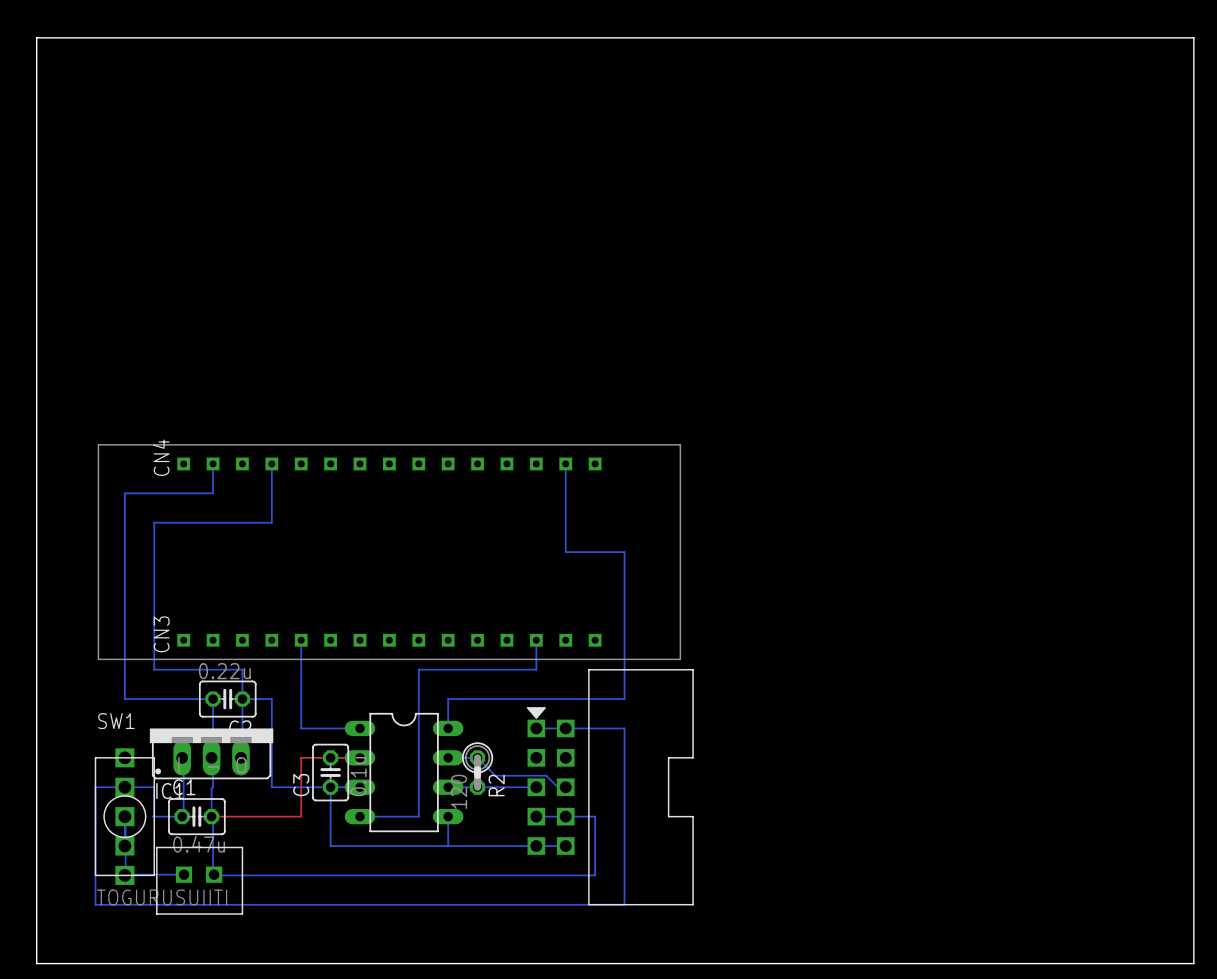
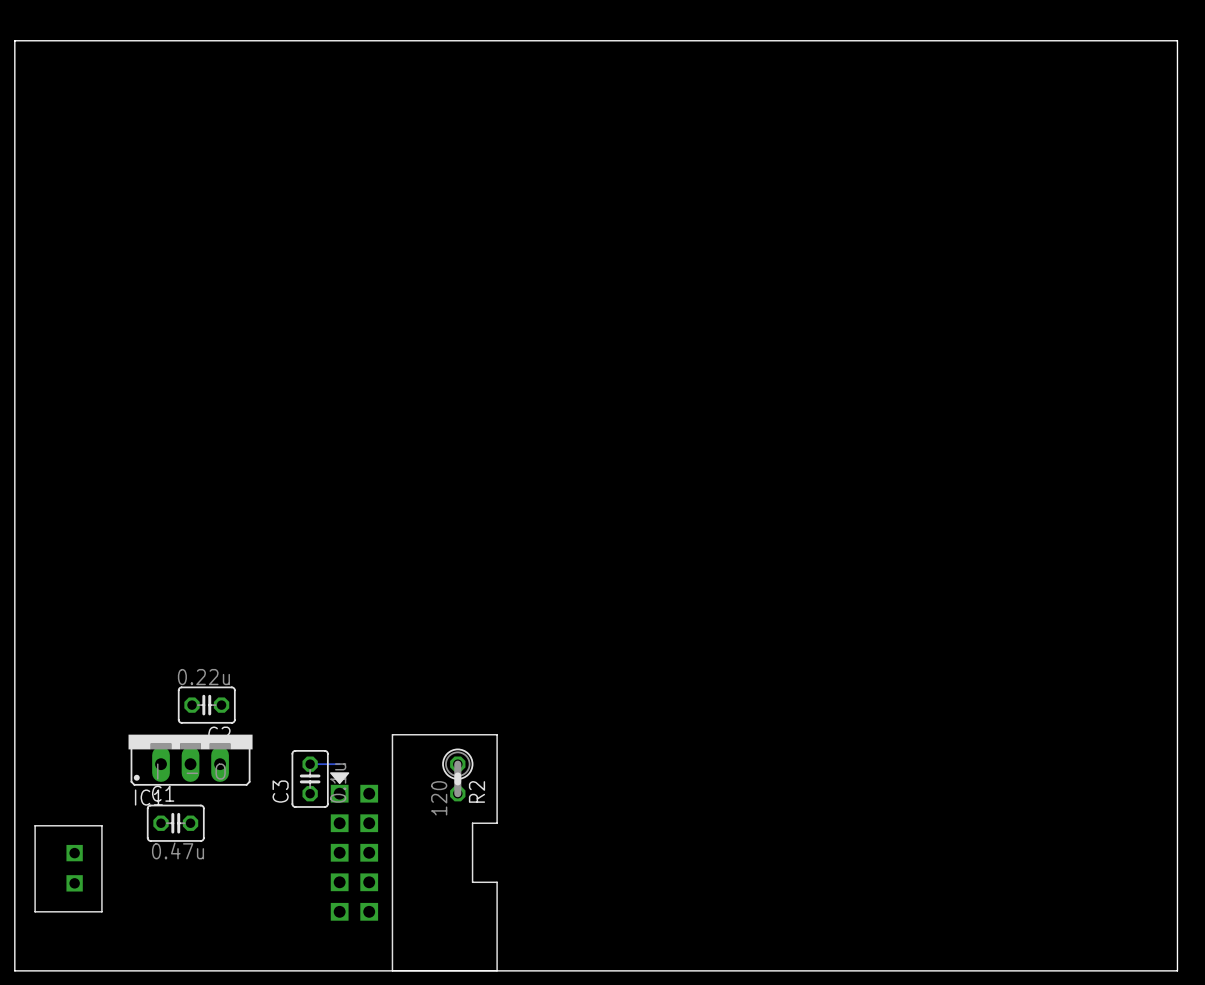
bottom track: (213, 463) (213, 493) (124, 493) (124, 699) (213, 699) (213, 875) (595, 875) (595, 816) (536, 816) -> none
bottom track: (271, 463) (271, 522) (154, 522) (154, 669) (242, 669) (240, 757) -> none
bottom track: (565, 463) (565, 552) (624, 552) (624, 699) (448, 699) (448, 728) -> none
part: (389, 552) -> none
bottom track: (301, 640) (301, 728) (360, 728) -> none
bottom track: (536, 640) (536, 669) (418, 669) (418, 816) (360, 816) -> none
bottom track: (242, 699) (271, 699) (271, 787) (360, 787) -> none
bottom track: (536, 728) (624, 728) (624, 904) (95, 904) (95, 787) (154, 787) (154, 816) -> none
bottom track: (182, 757) (183, 816) (152, 816) -> none
top track: (360, 757) (301, 757) (301, 816) (211, 816) -> none
bottom track: (448, 757) (477, 757) (495, 775) (546, 775) (557, 787) (565, 787) -> none
part: (404, 772) -> none
bottom track: (330, 787) (330, 846) (565, 846) -> none
bottom track: (448, 787) (536, 787) -> none
part position: (610, 787) -> (413, 852)
SW1: TOGURUSUIITI (124, 816) -> none
bottom track: (448, 816) (448, 846) -> none
bottom track: (124, 846) (124, 816) (125, 874) (184, 874) -> none
part rotation: 0° (199, 880) -> 90° clockwise (68, 868)
part position: (199, 880) -> (68, 868)

